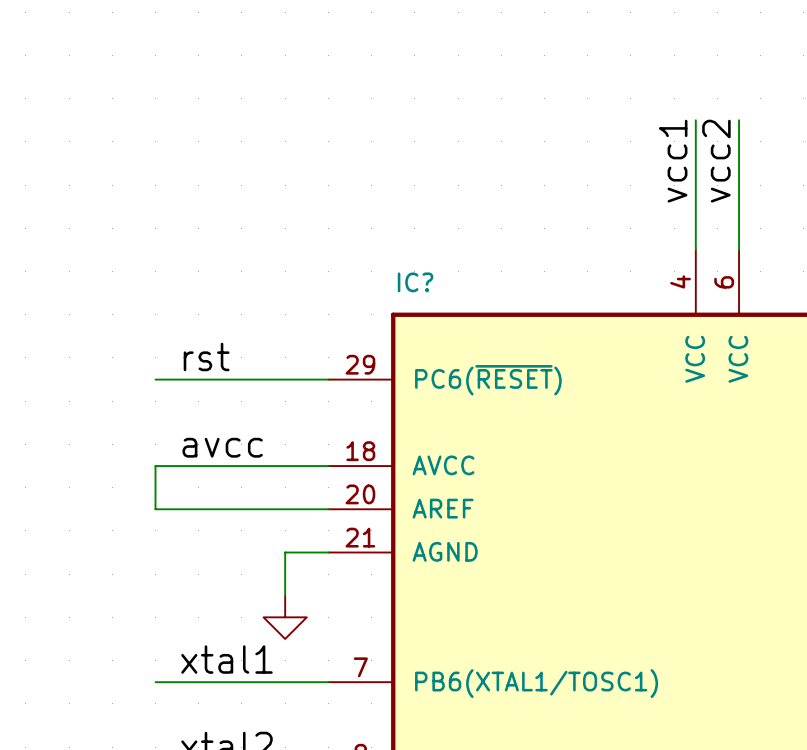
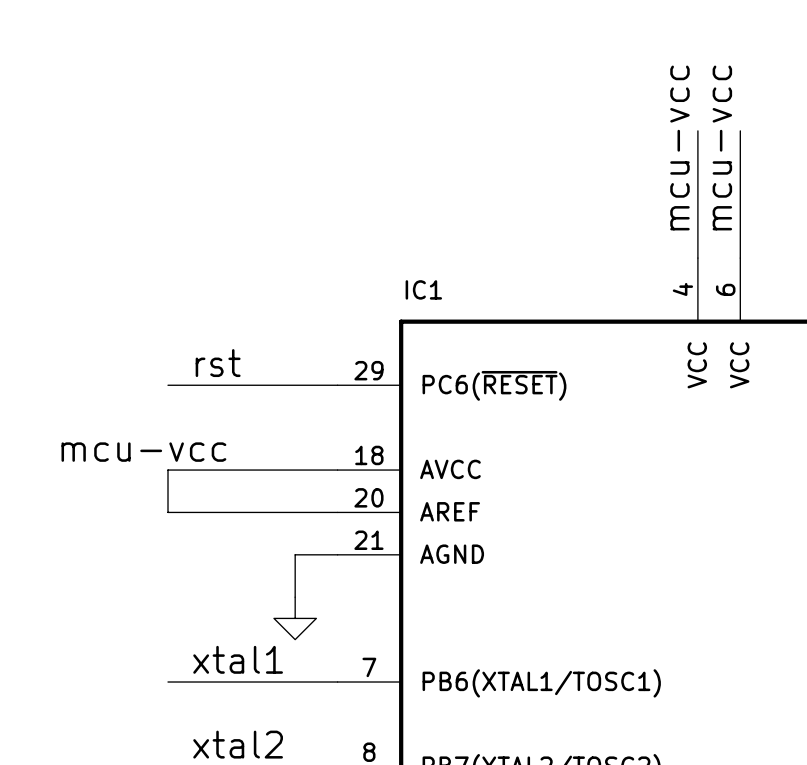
label: none -> mcu-vcc (679, 147)
label: none -> mcu-vcc (722, 147)
label: vcc1 (673, 161) -> none
label: vcc2 (716, 161) -> none
IC? name: IC? (415, 282) -> IC1 (423, 289)
label: none -> mcu-vcc (143, 452)
label: avcc (222, 447) -> none

